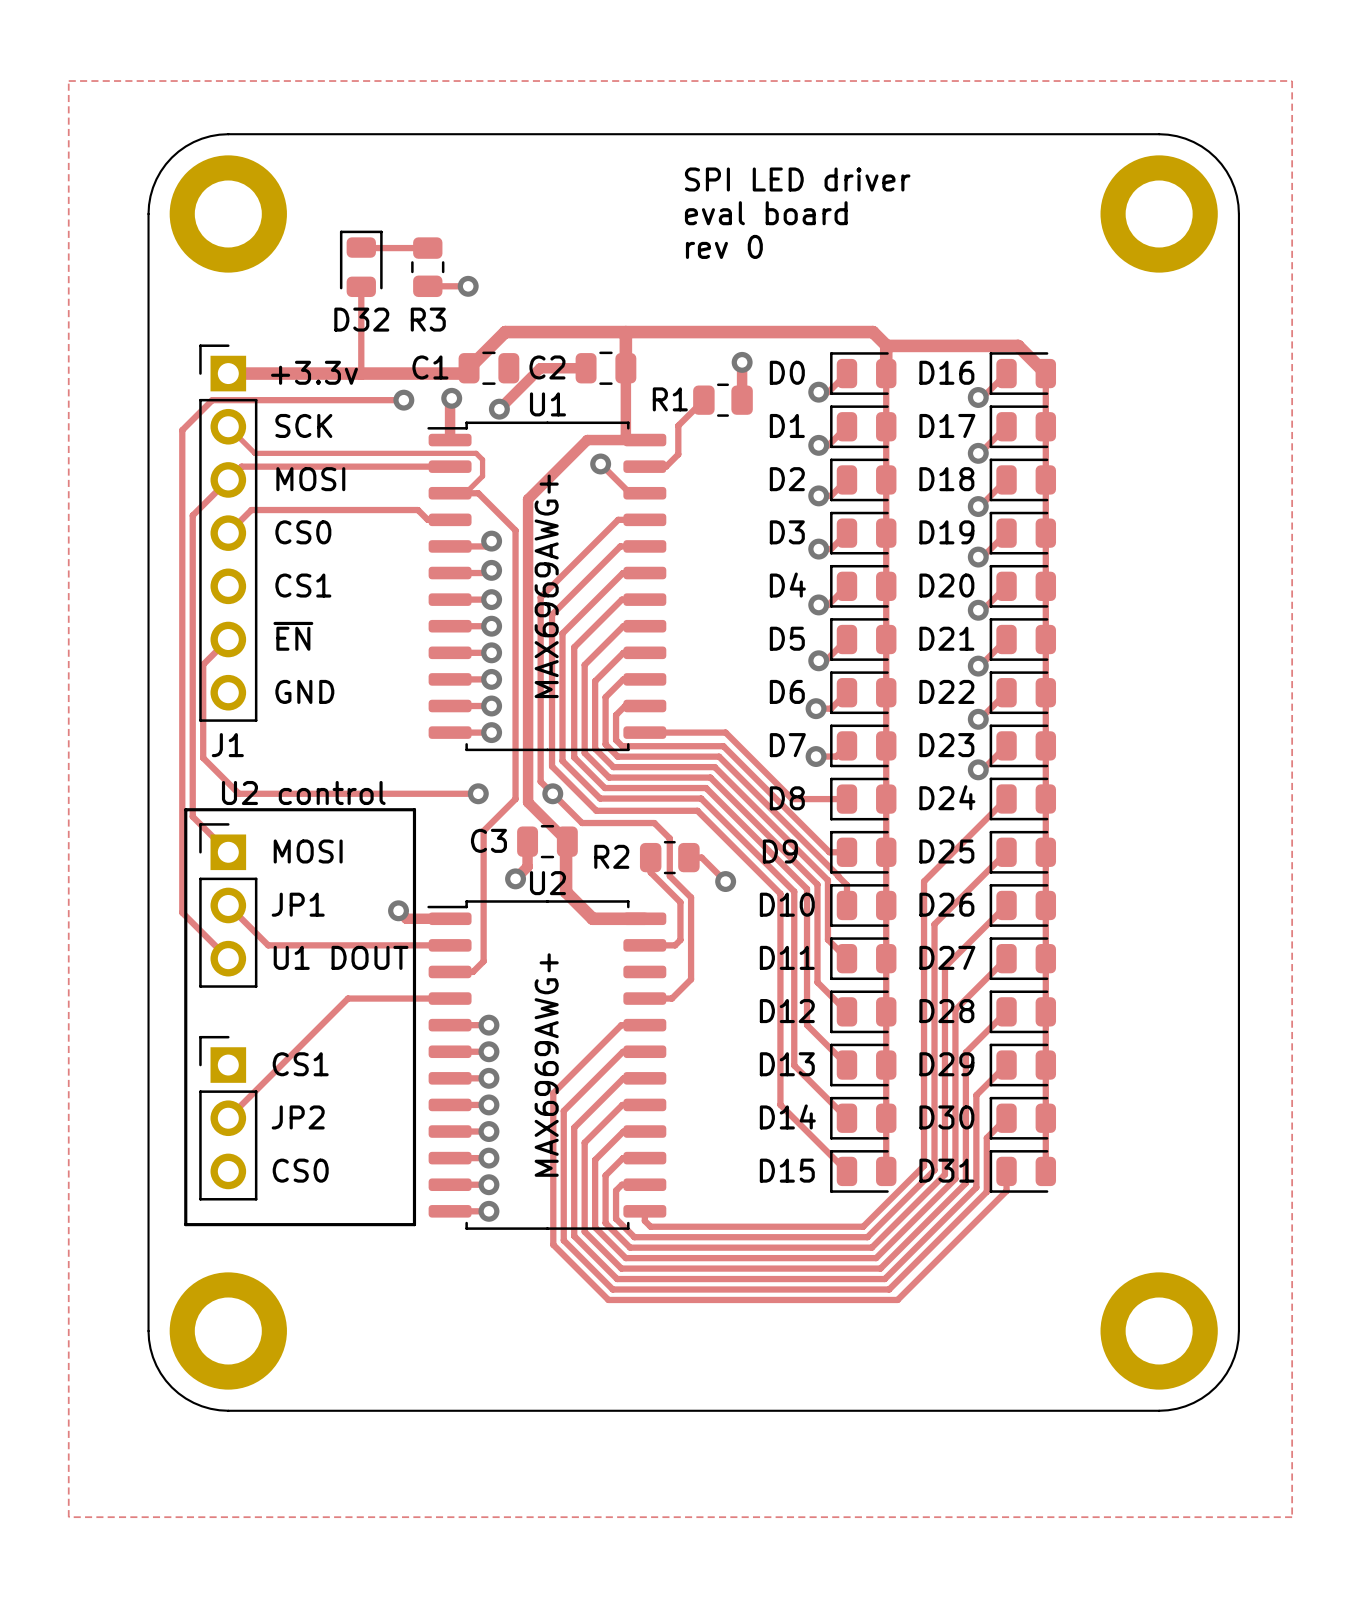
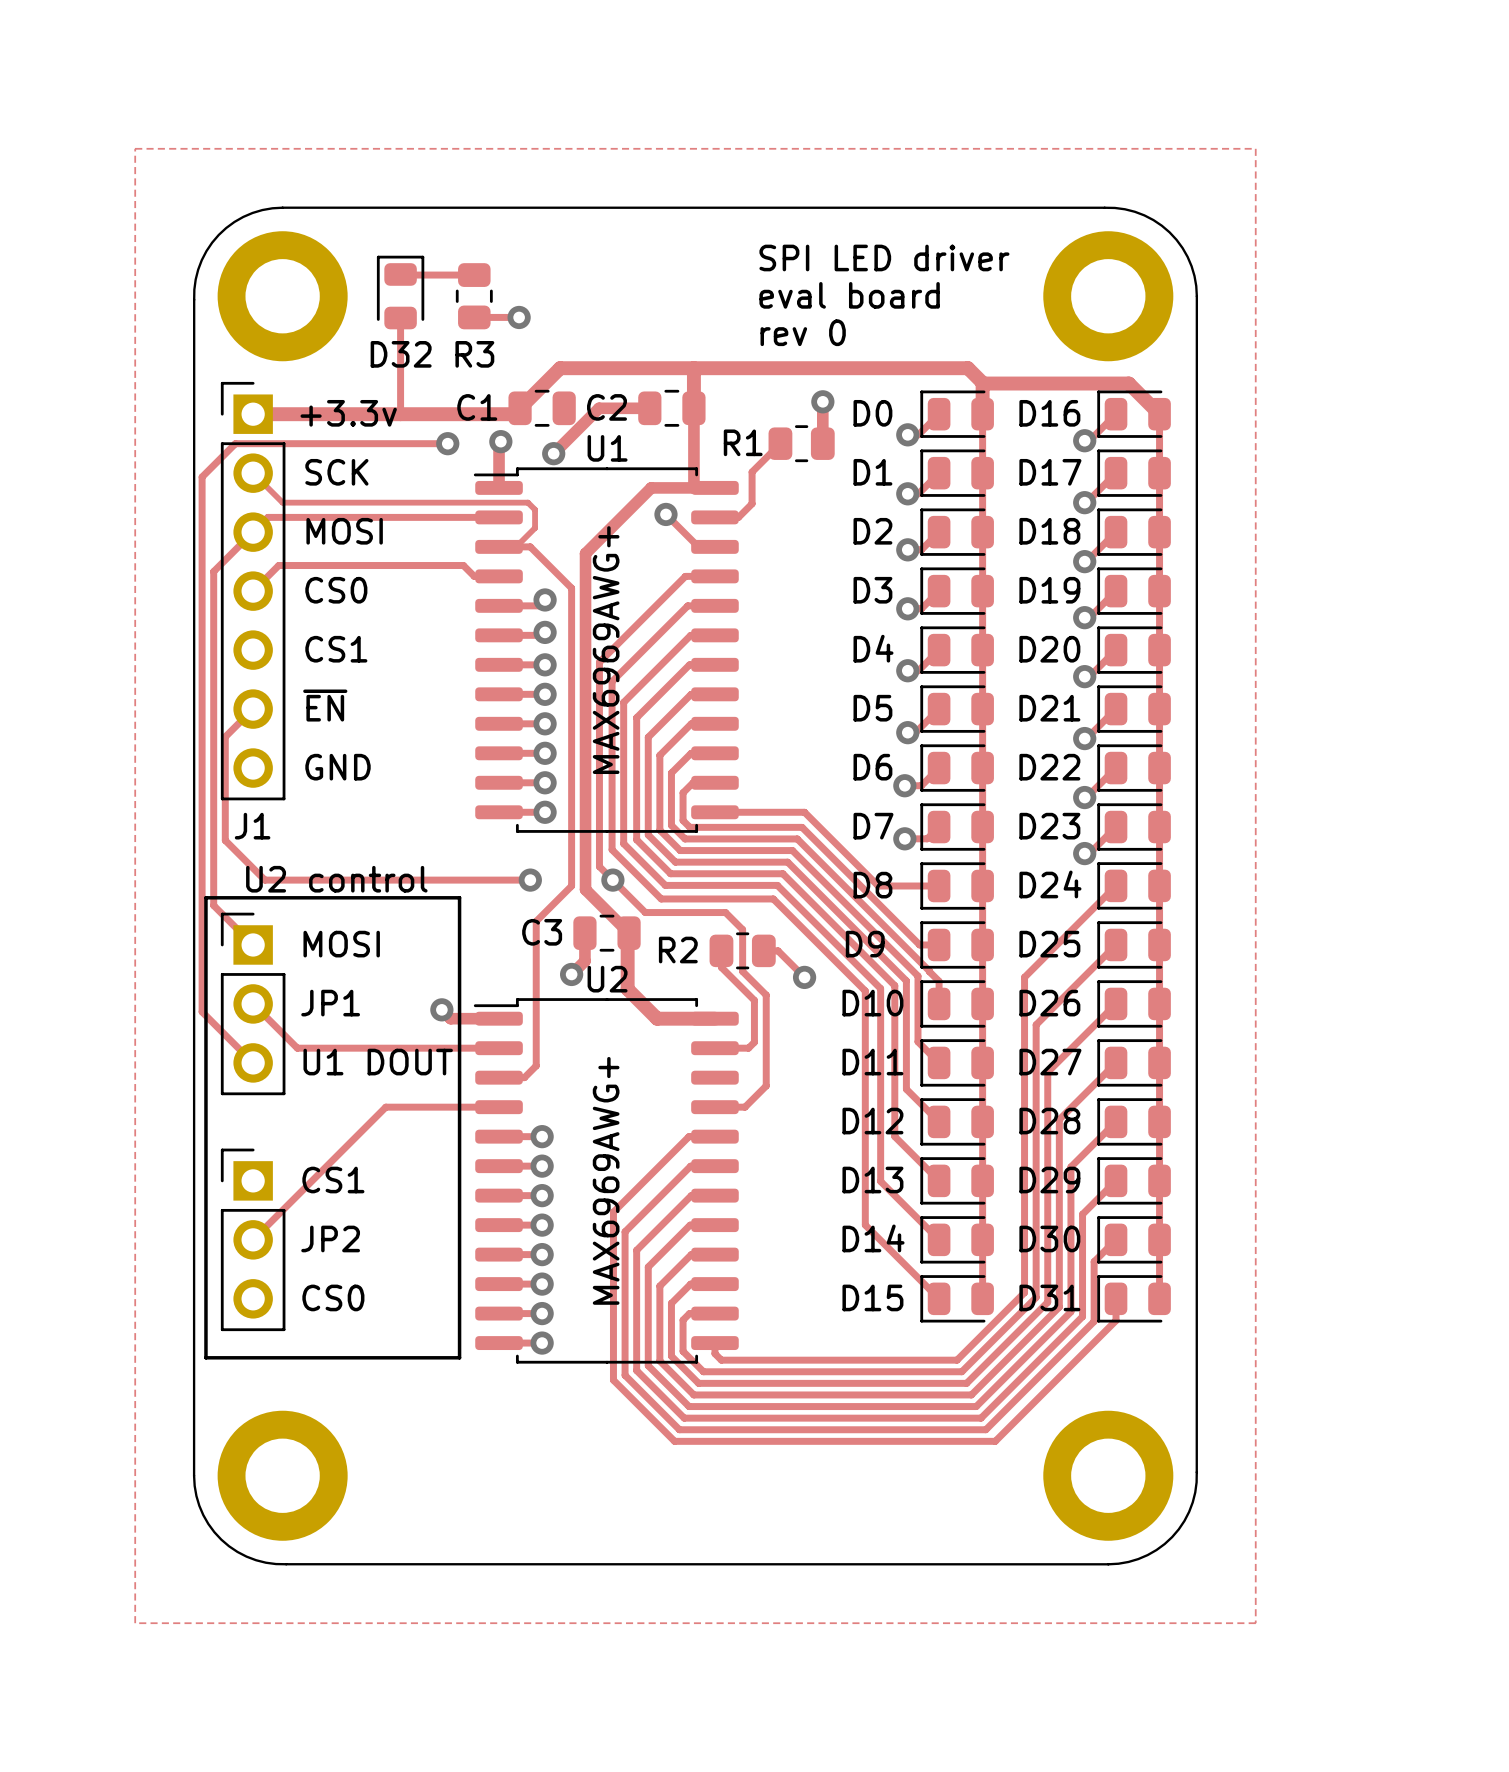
zone outline: (68, 81) (68, 1517) (1292, 1517) (1292, 81) (68, 81) -> (135, 148) (135, 1623) (1255, 1623) (1255, 148) (135, 148)
board edge: (228, 134) (1159, 134) (1176, 136) (1193, 142) (1208, 151) (1221, 164) (1234, 187) (1238, 213) (1238, 1331) (1236, 1348) (1231, 1365) (1221, 1380) (1208, 1393) (1185, 1406) (1159, 1410) (228, 1410) (210, 1408) (193, 1402) (178, 1393) (165, 1380) (153, 1357) (148, 1331) (148, 213) (153, 187) (160, 171) (171, 157) (185, 146) (201, 138) (228, 134) -> (282, 207) (252, 212) (226, 227) (206, 251) (198, 269) (194, 289) (194, 1475) (199, 1505) (208, 1523) (221, 1539) (237, 1551) (256, 1560) (276, 1564) (1108, 1564) (1128, 1561) (1156, 1550) (1172, 1537) (1184, 1520) (1192, 1502) (1196, 1482) (1196, 296) (1194, 276) (1182, 248) (1169, 232) (1153, 220) (1134, 211) (1114, 207) (282, 207)
text position: SPI LED driver (797, 179) -> SPI LED driver (884, 257)
part position: (228, 213) -> (282, 296)
text position: eval board (766, 213) -> eval board (849, 295)
part position: (1159, 213) -> (1108, 296)
text position: rev 0 (724, 246) -> rev 0 (803, 332)
part position: (228, 1331) -> (282, 1475)
part position: (1159, 1331) -> (1108, 1475)

